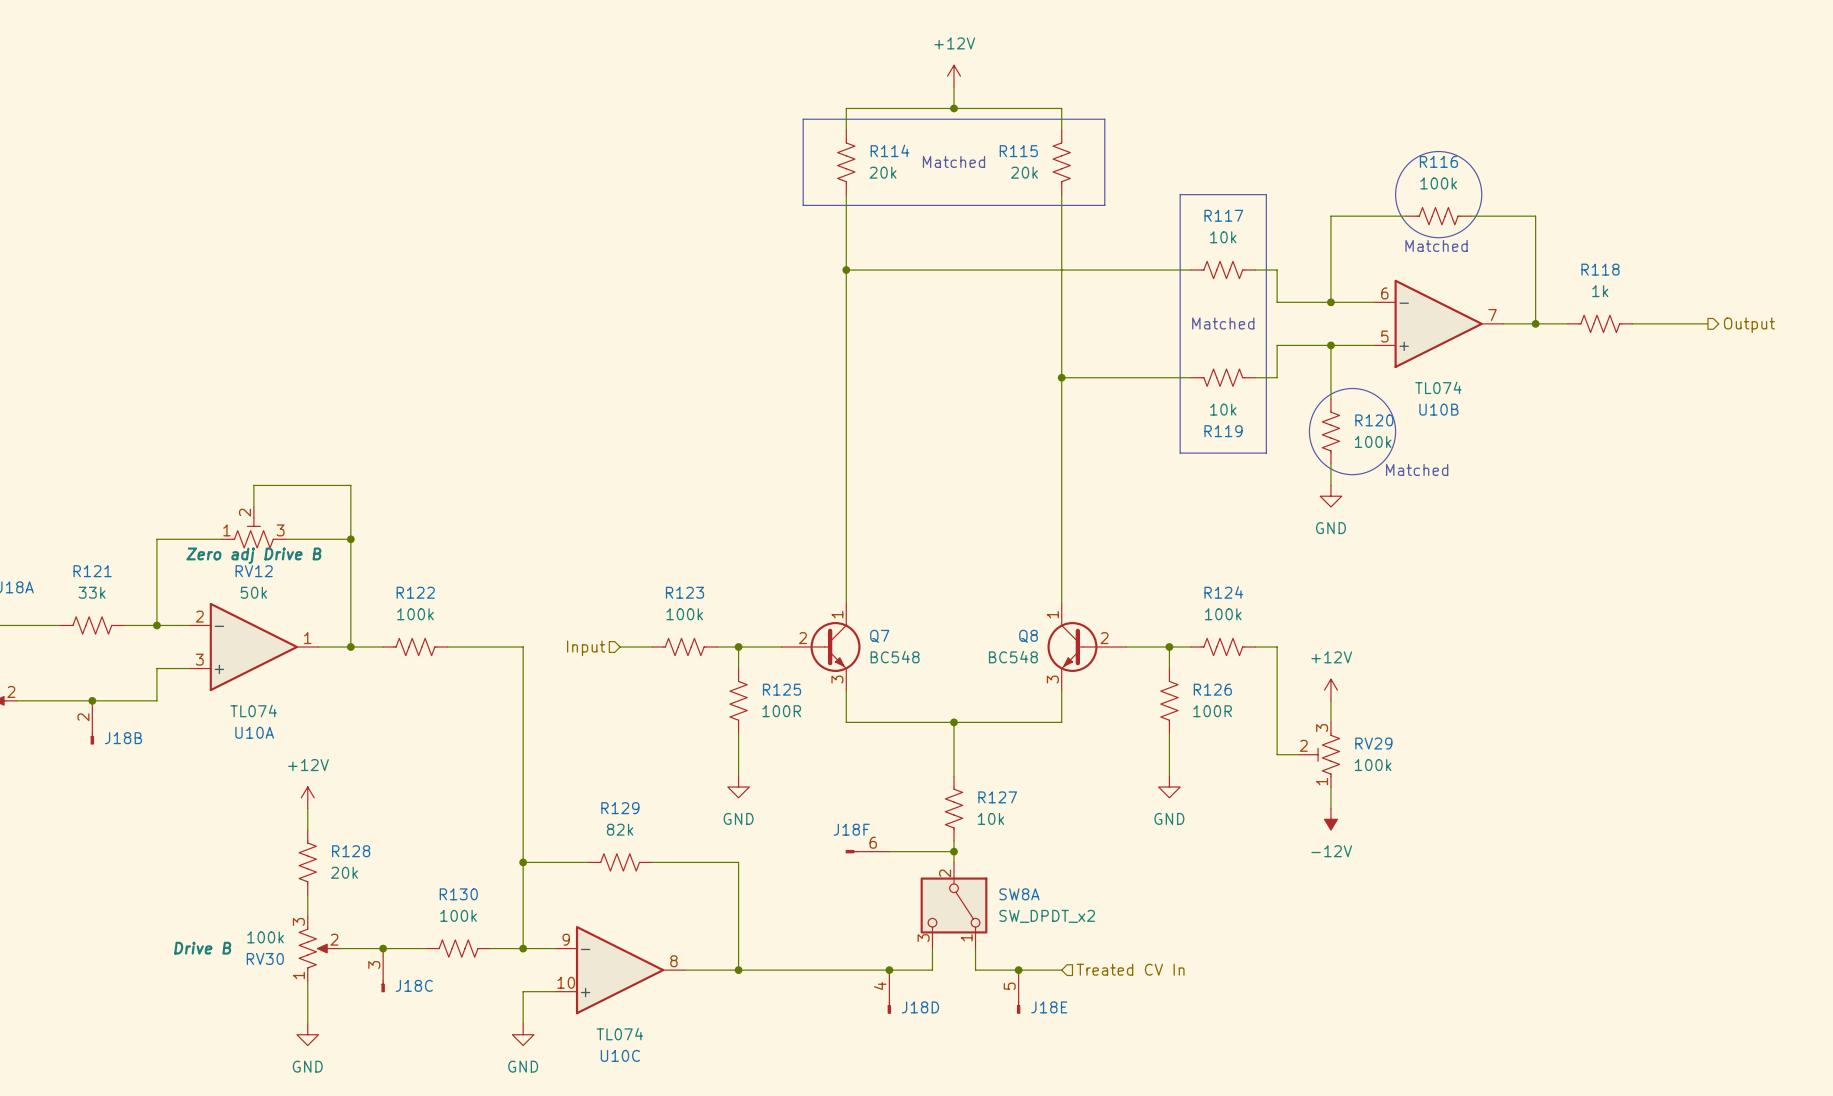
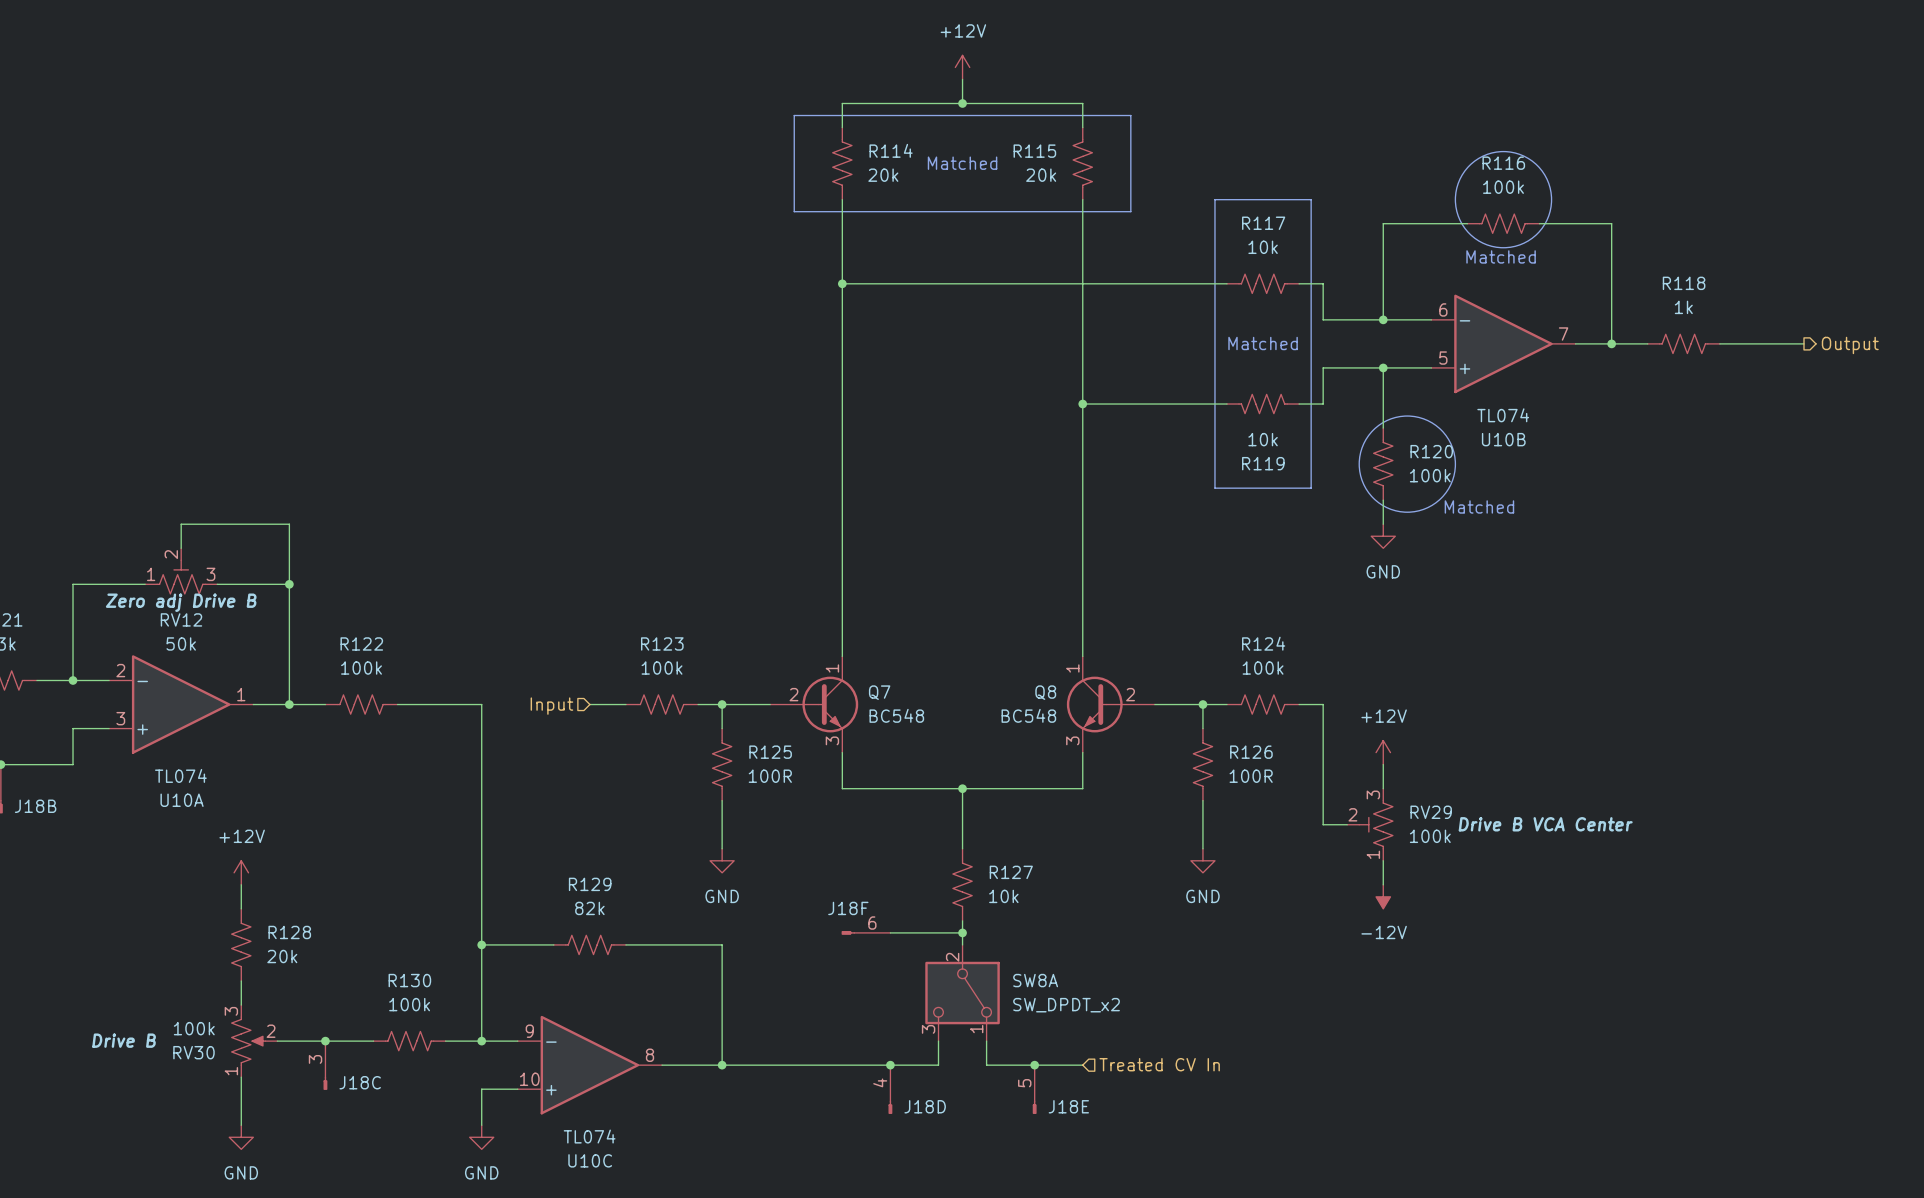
RV29 text: none -> Drive B VCA Center (1545, 824)

